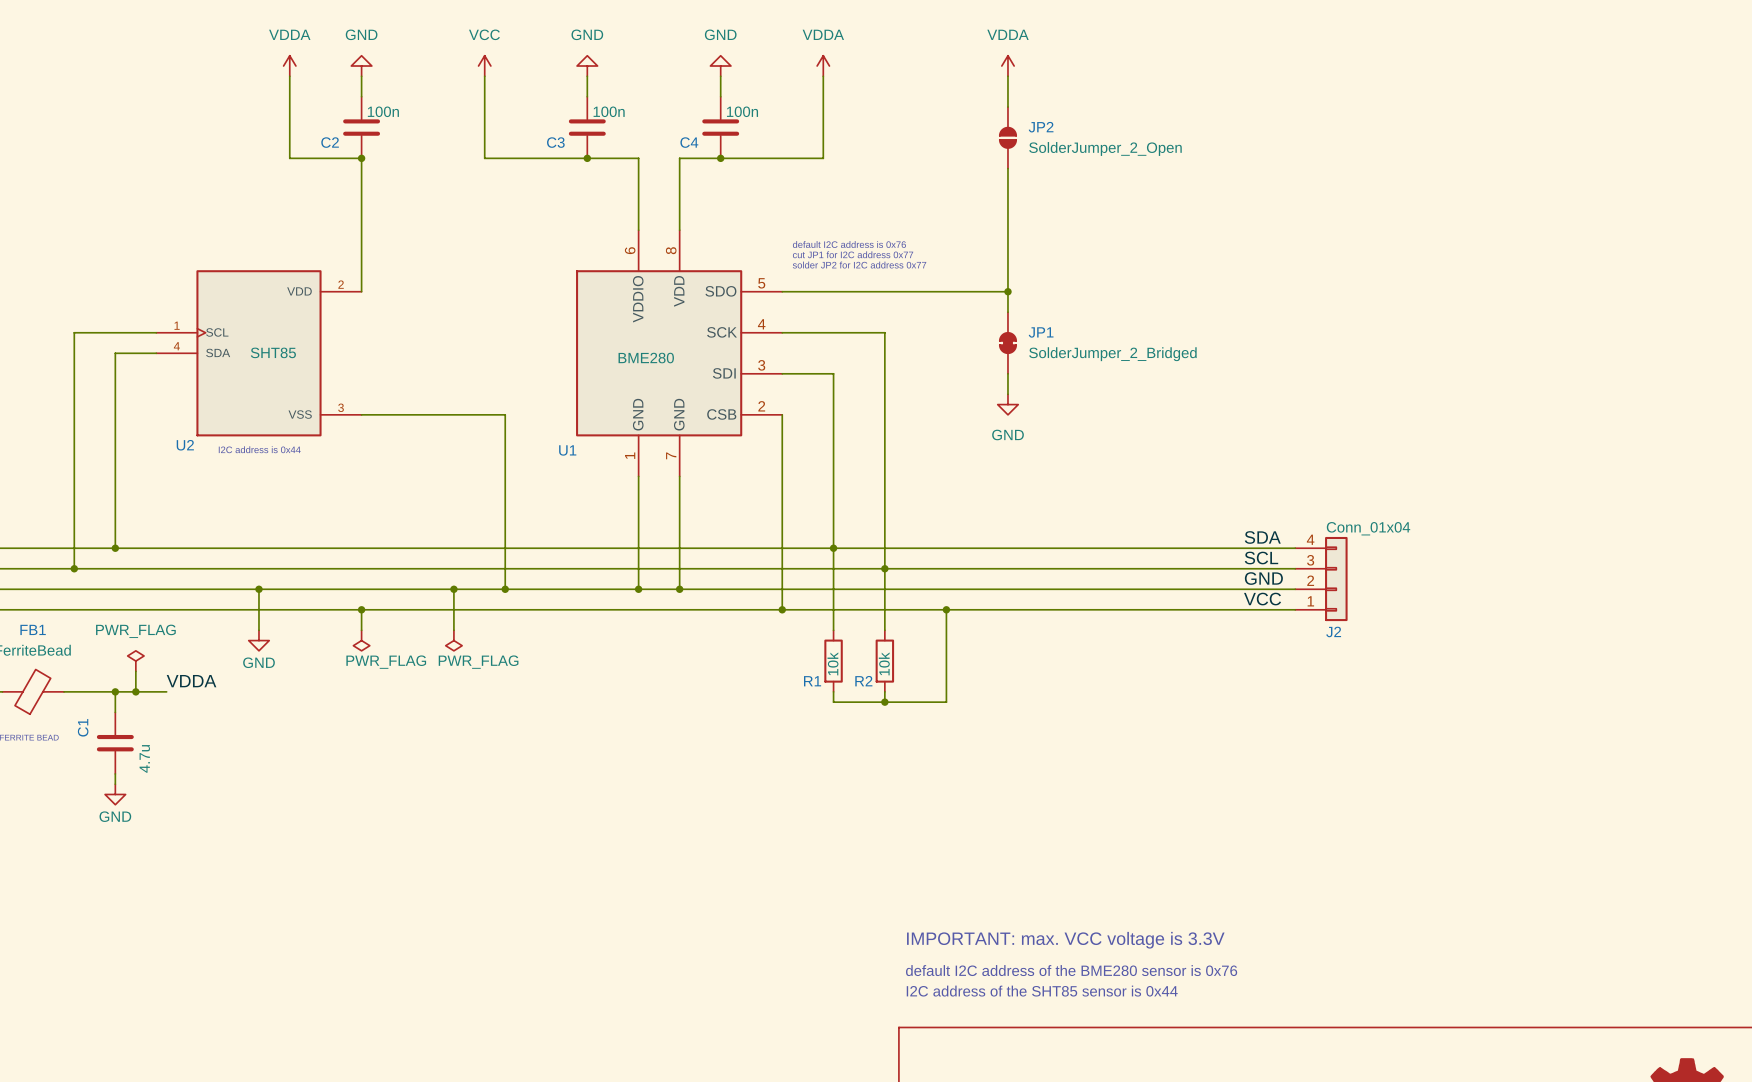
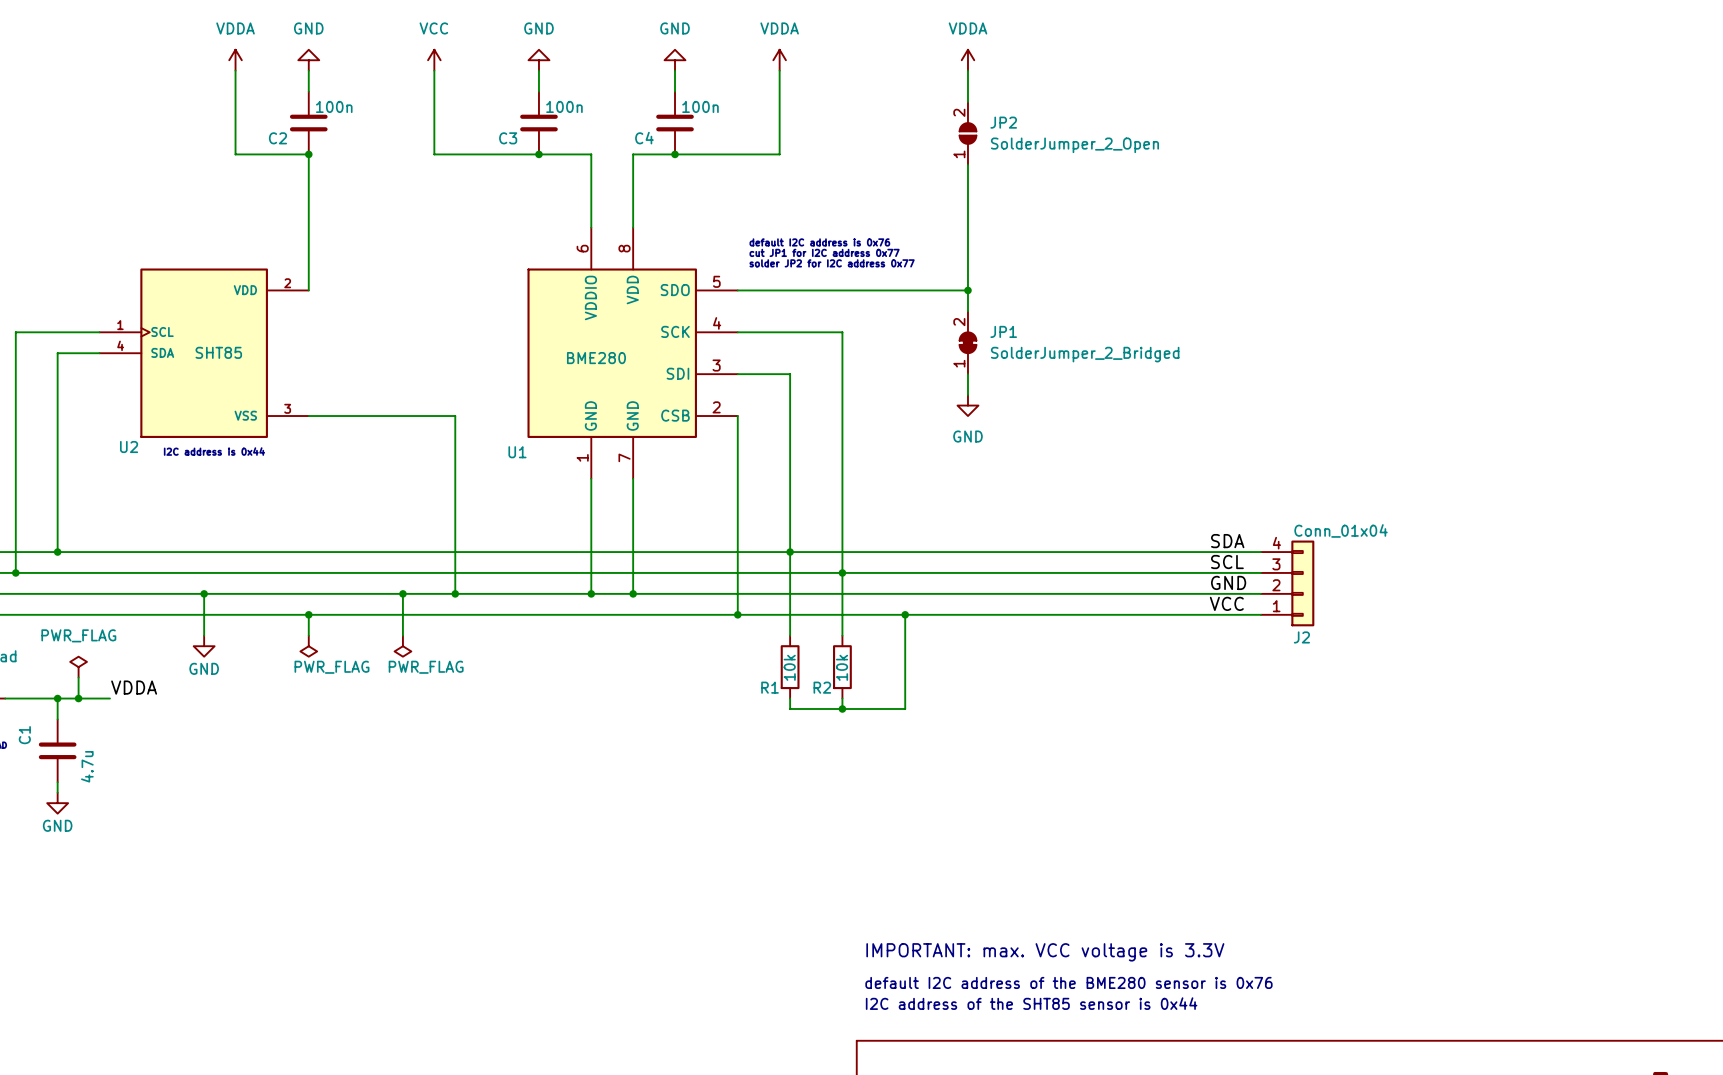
JP2 pin number: none -> 2 (959, 112)
JP2 pin number: none -> 1 (959, 154)
JP1 pin number: none -> 2 (959, 322)
JP1 pin number: none -> 1 (959, 363)

